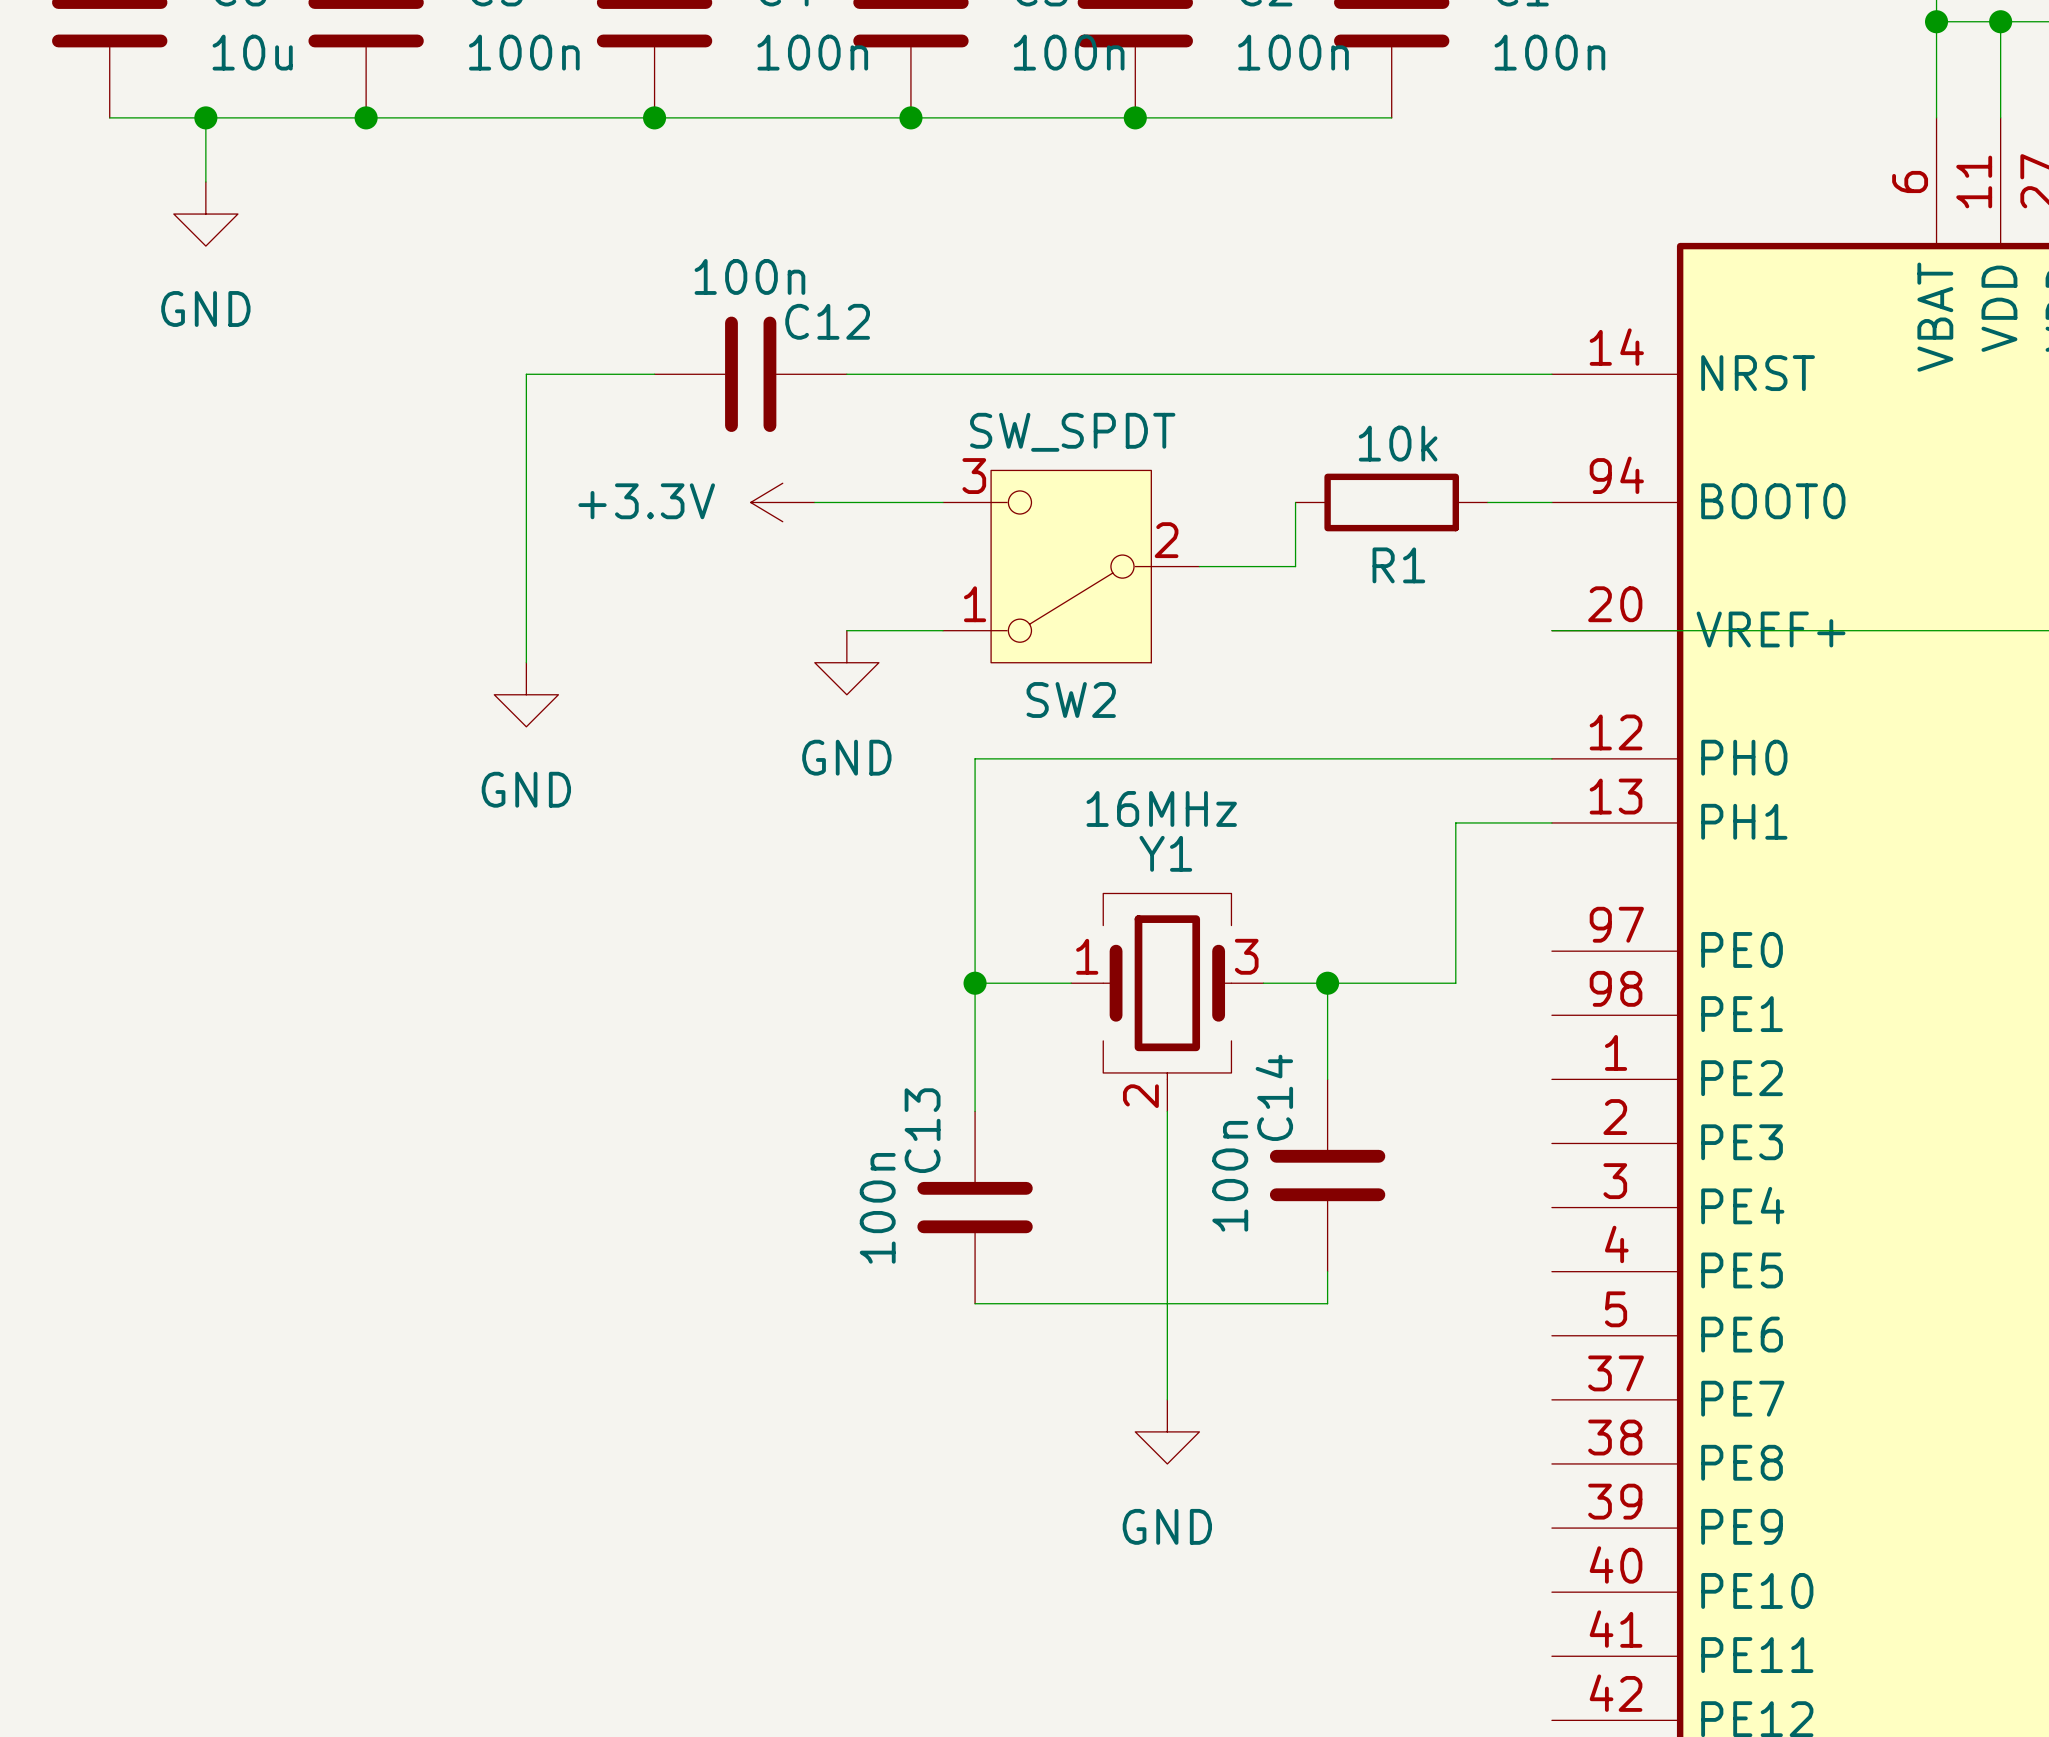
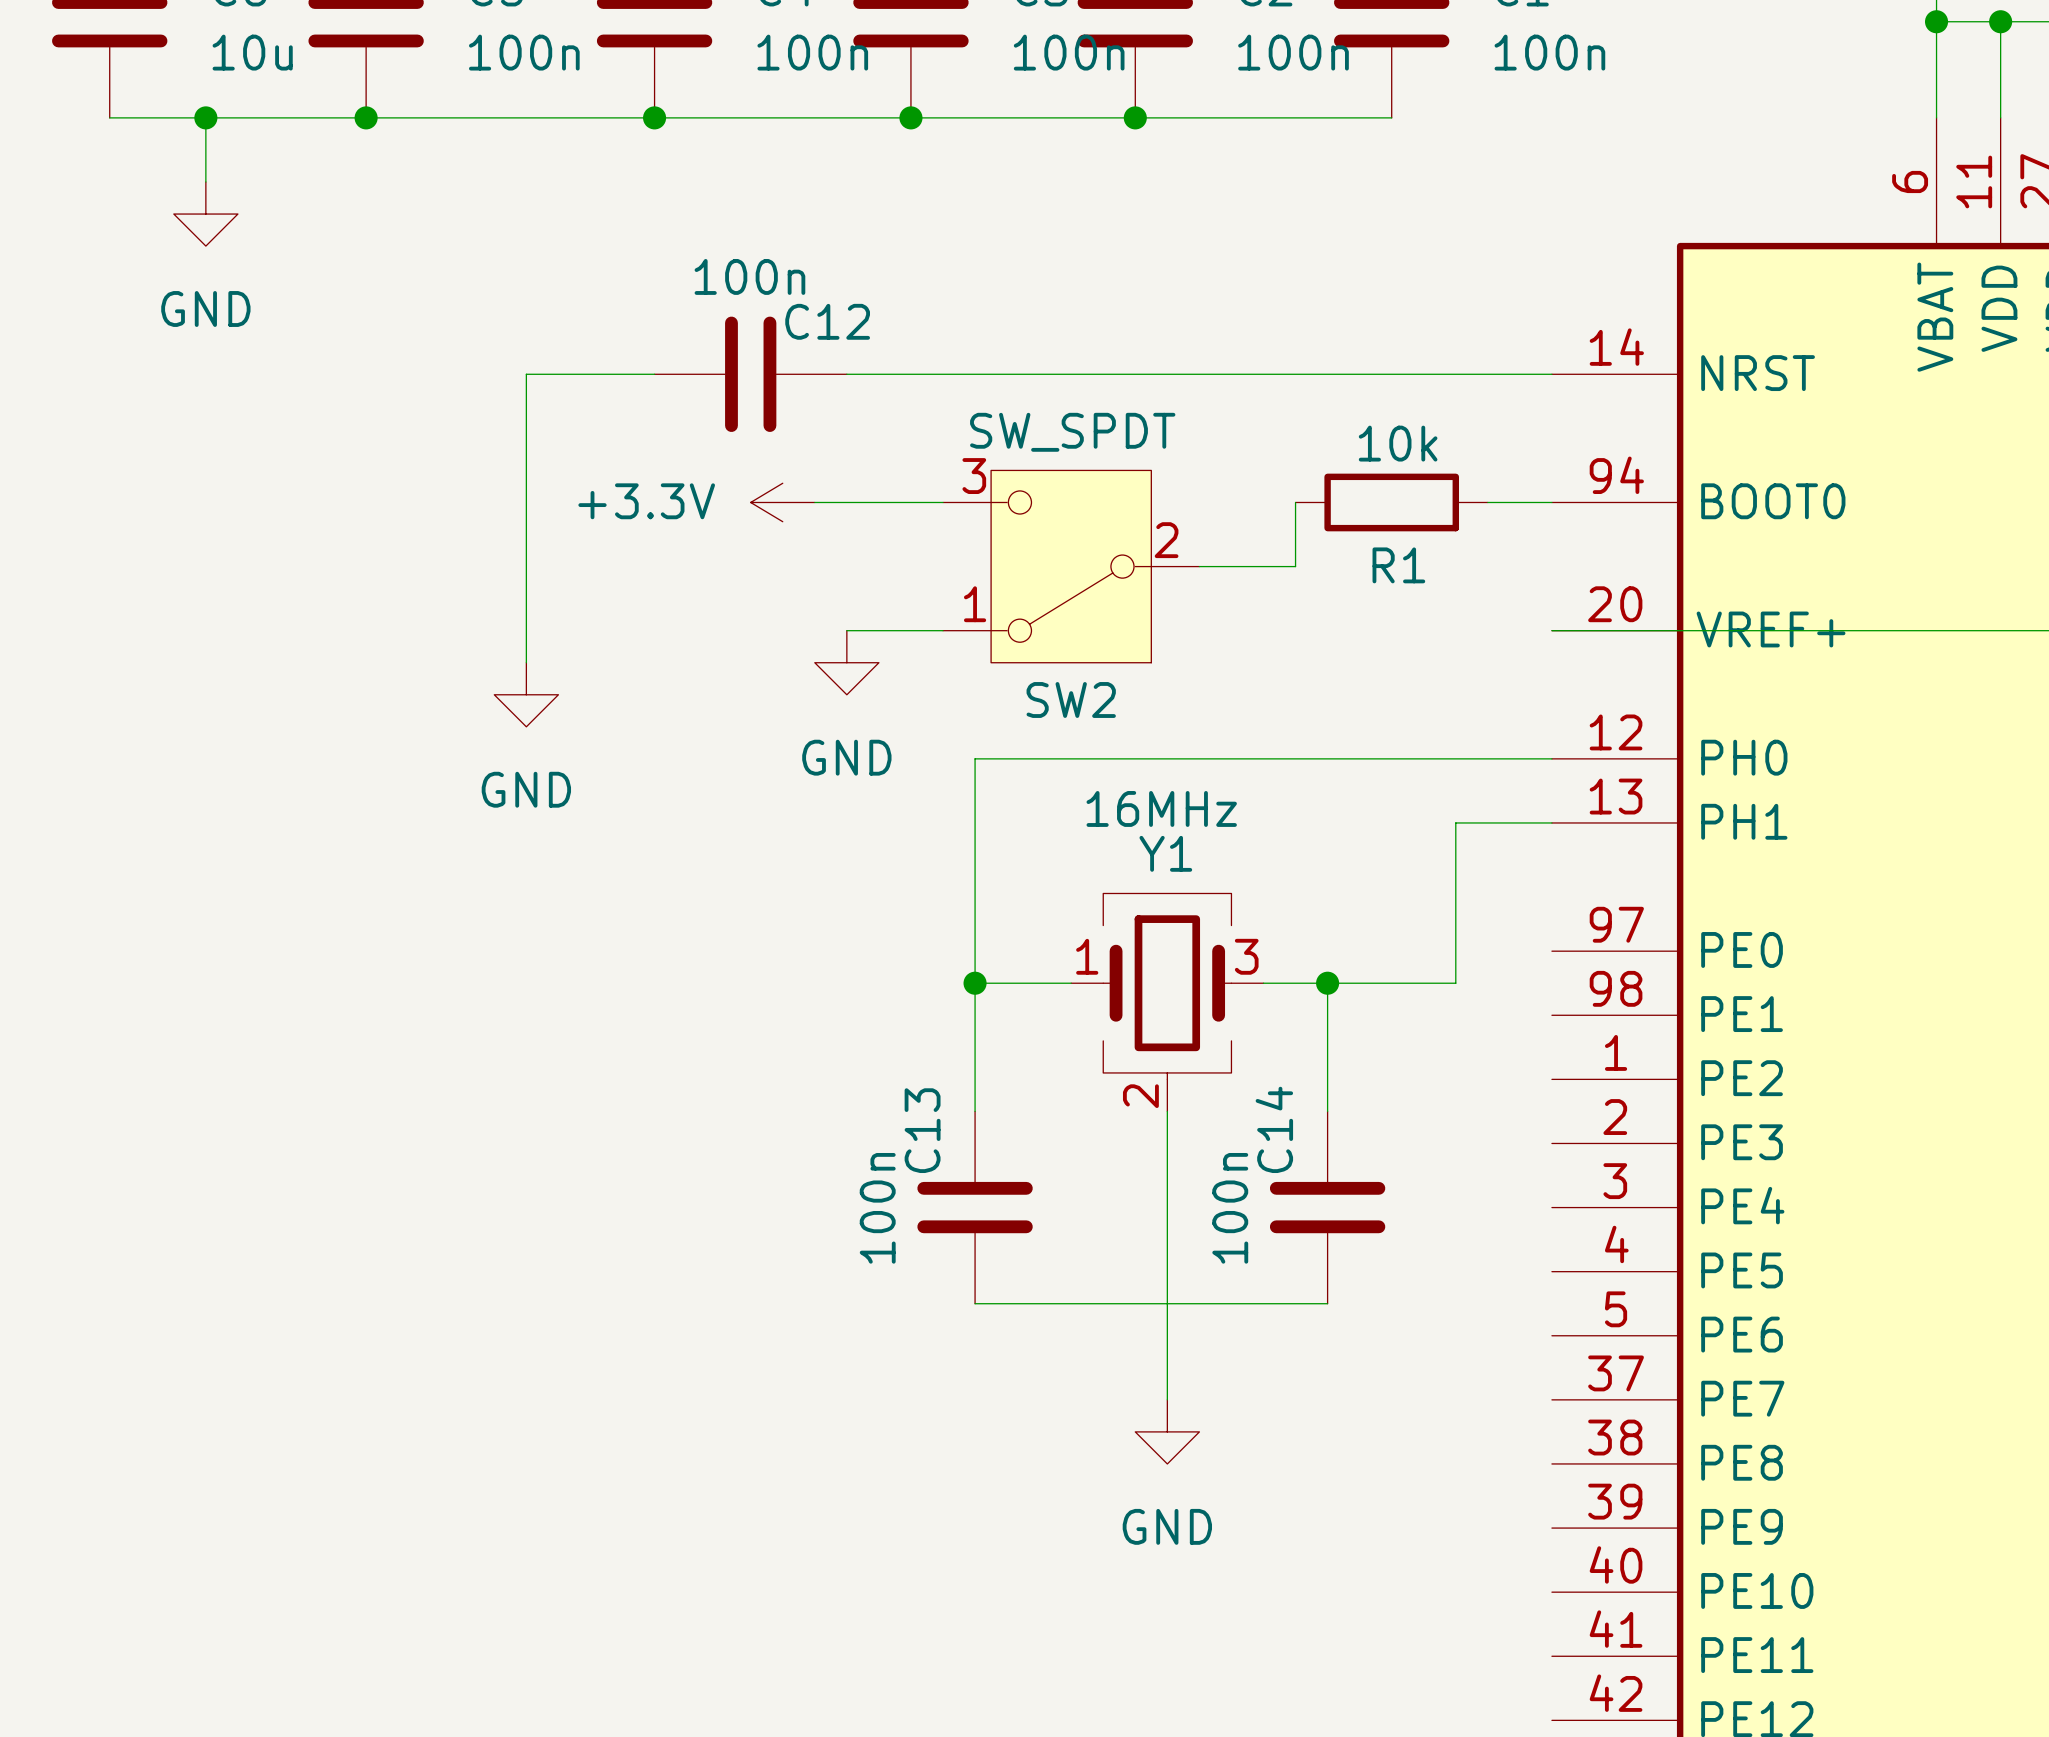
C14 position: (1327, 1175) -> (1327, 1207)

